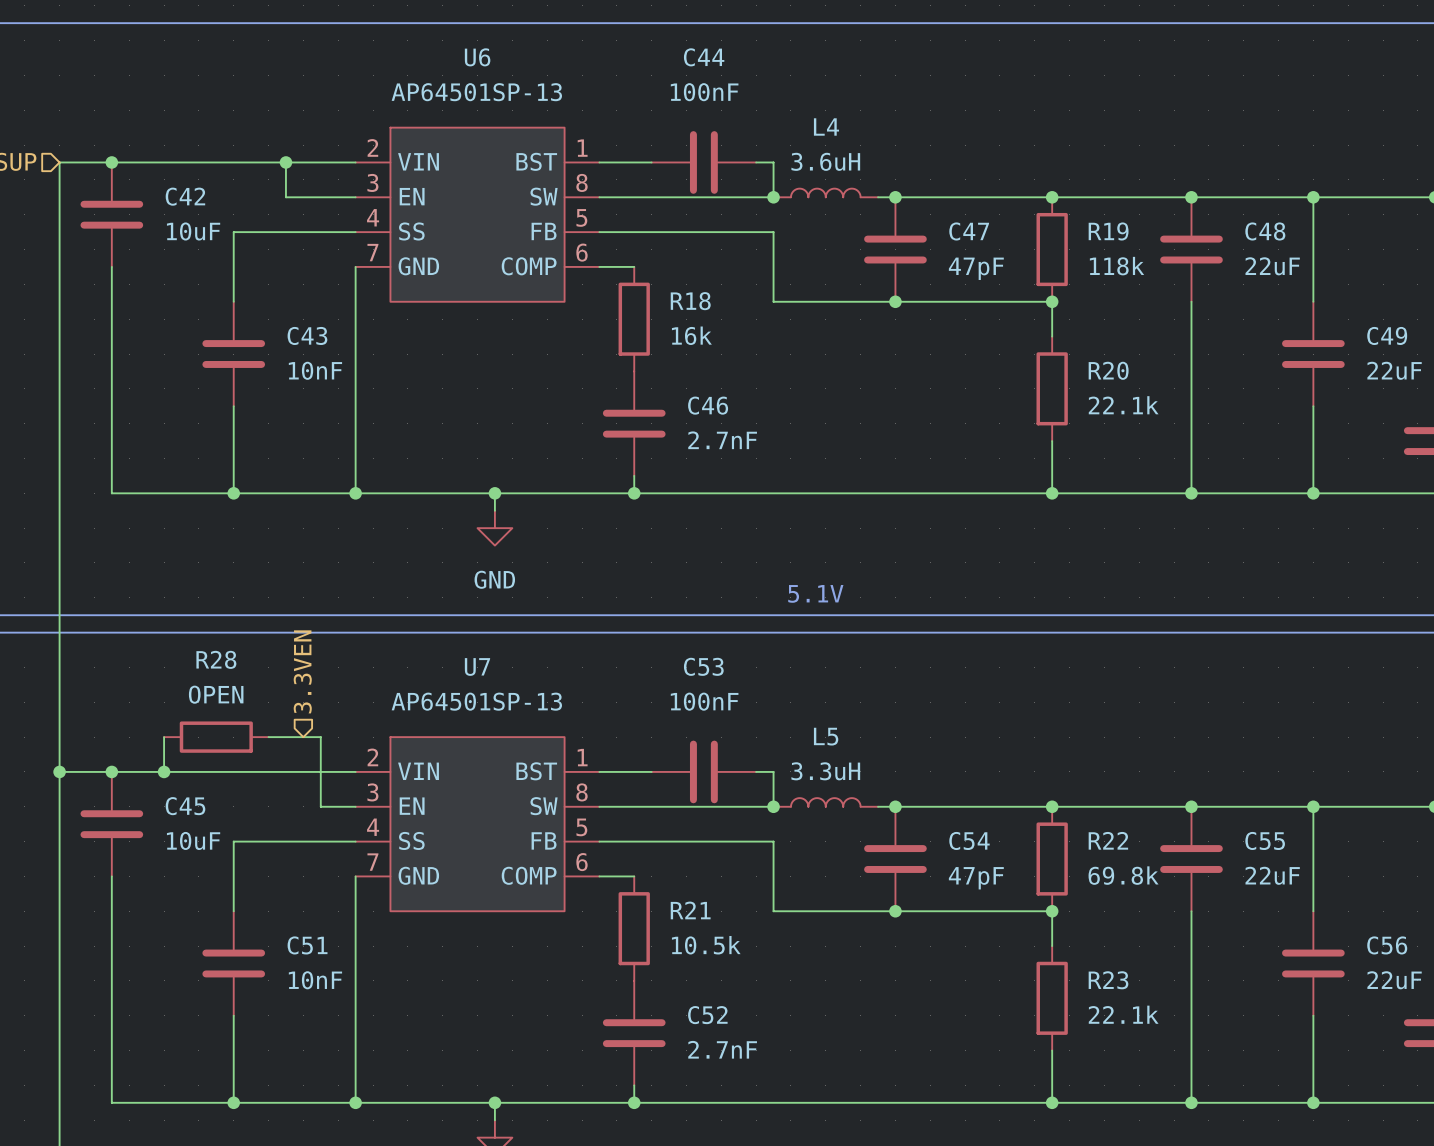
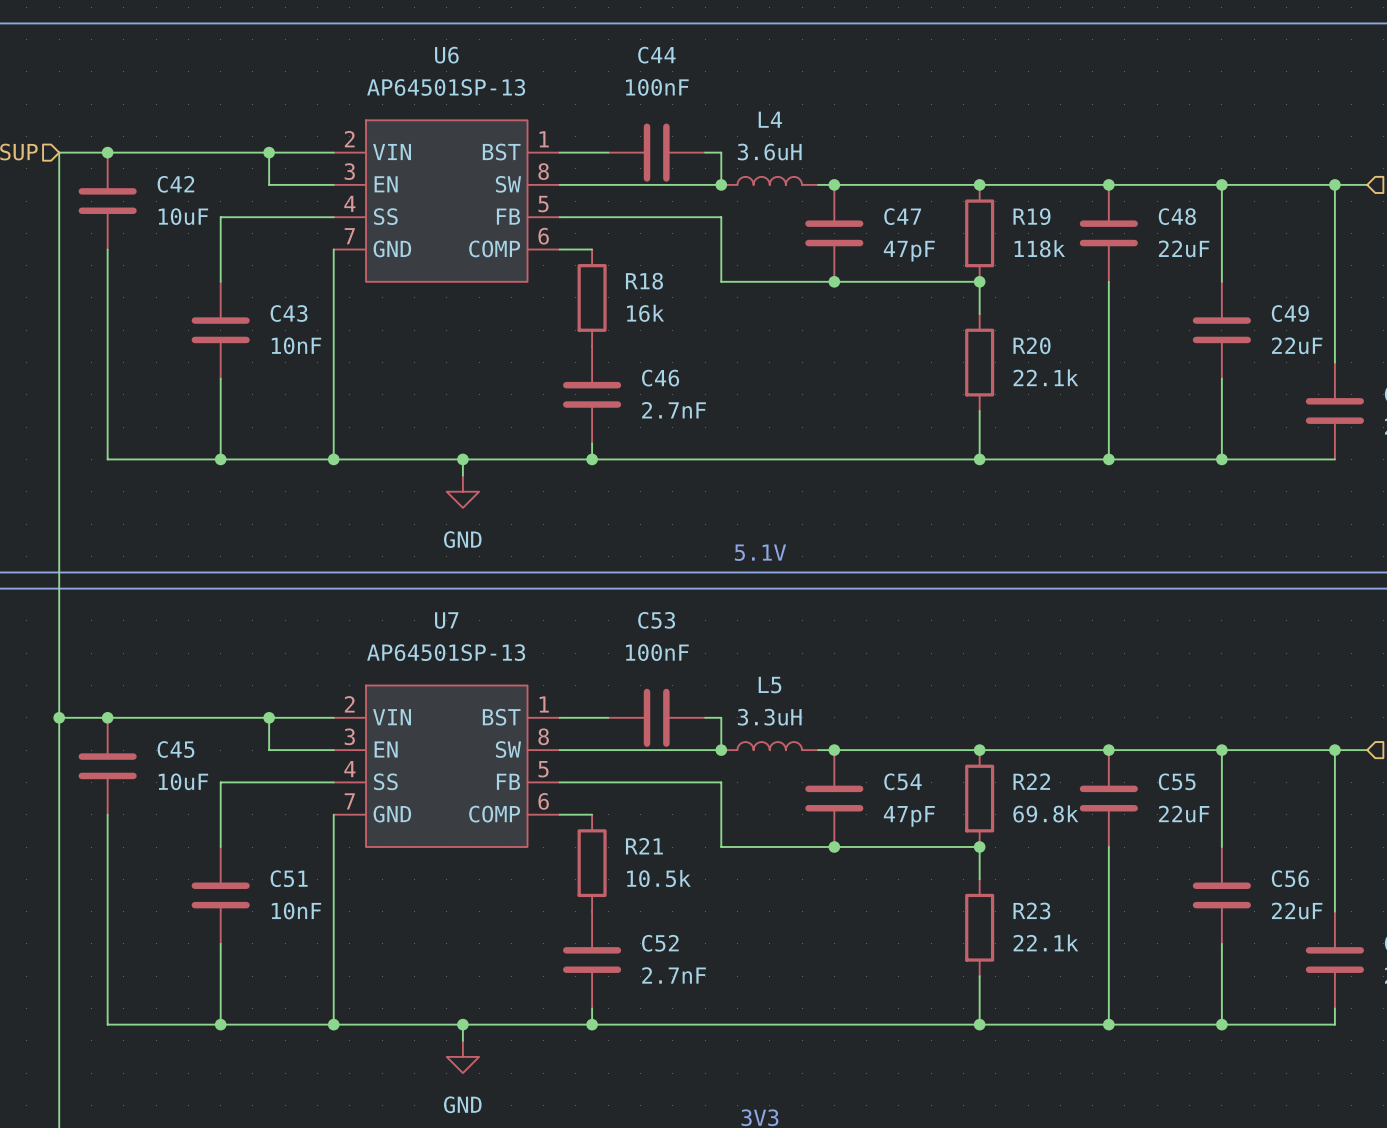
hierarchical label: 3.3VEN (302, 671) -> none
wire: (164, 737) (164, 771) -> none
R28: OPEN (216, 737) -> none
wire: (268, 737) (320, 737) (320, 806) -> (269, 717) (269, 750) (301, 750)
junction: (164, 771) -> none
junction: none -> (269, 717)

